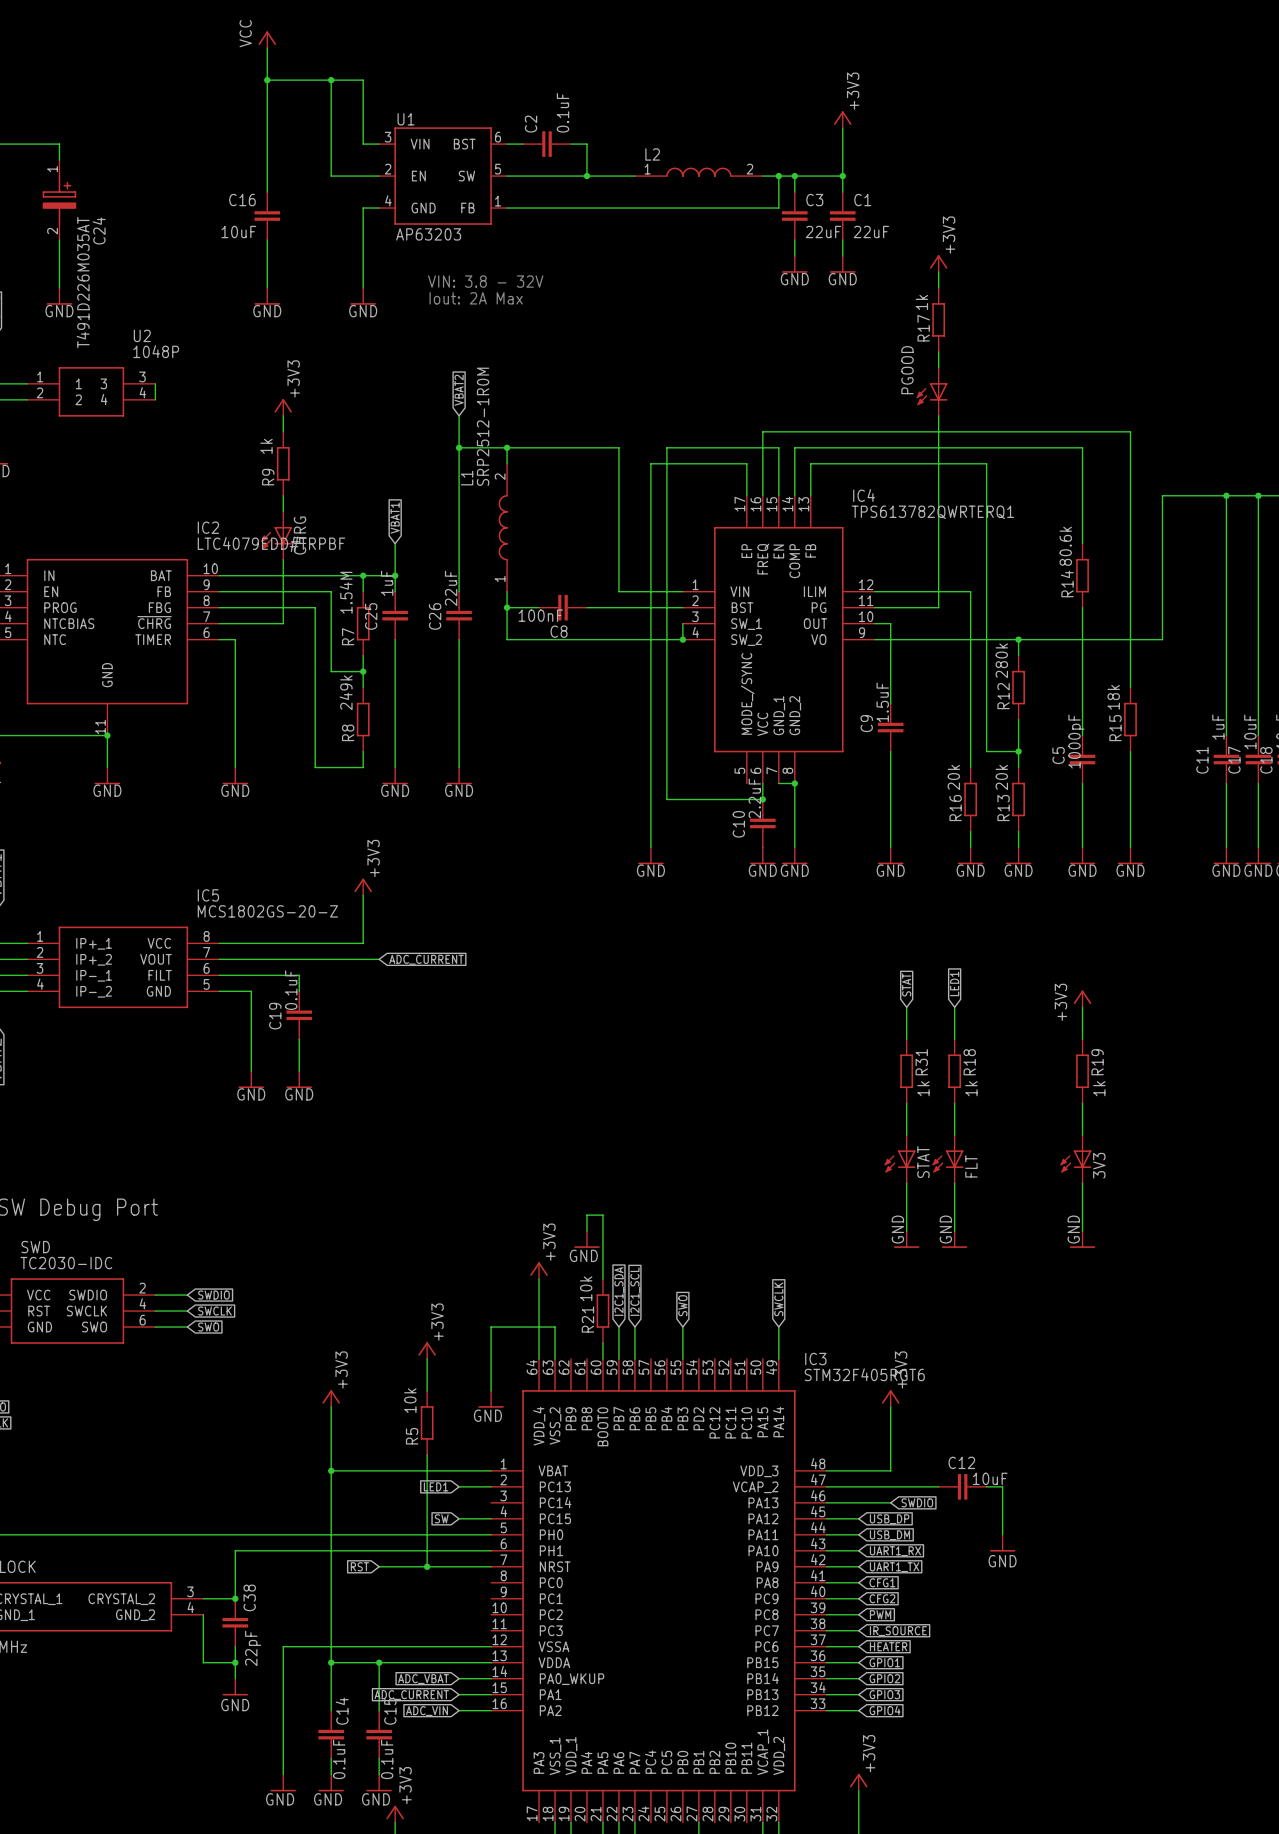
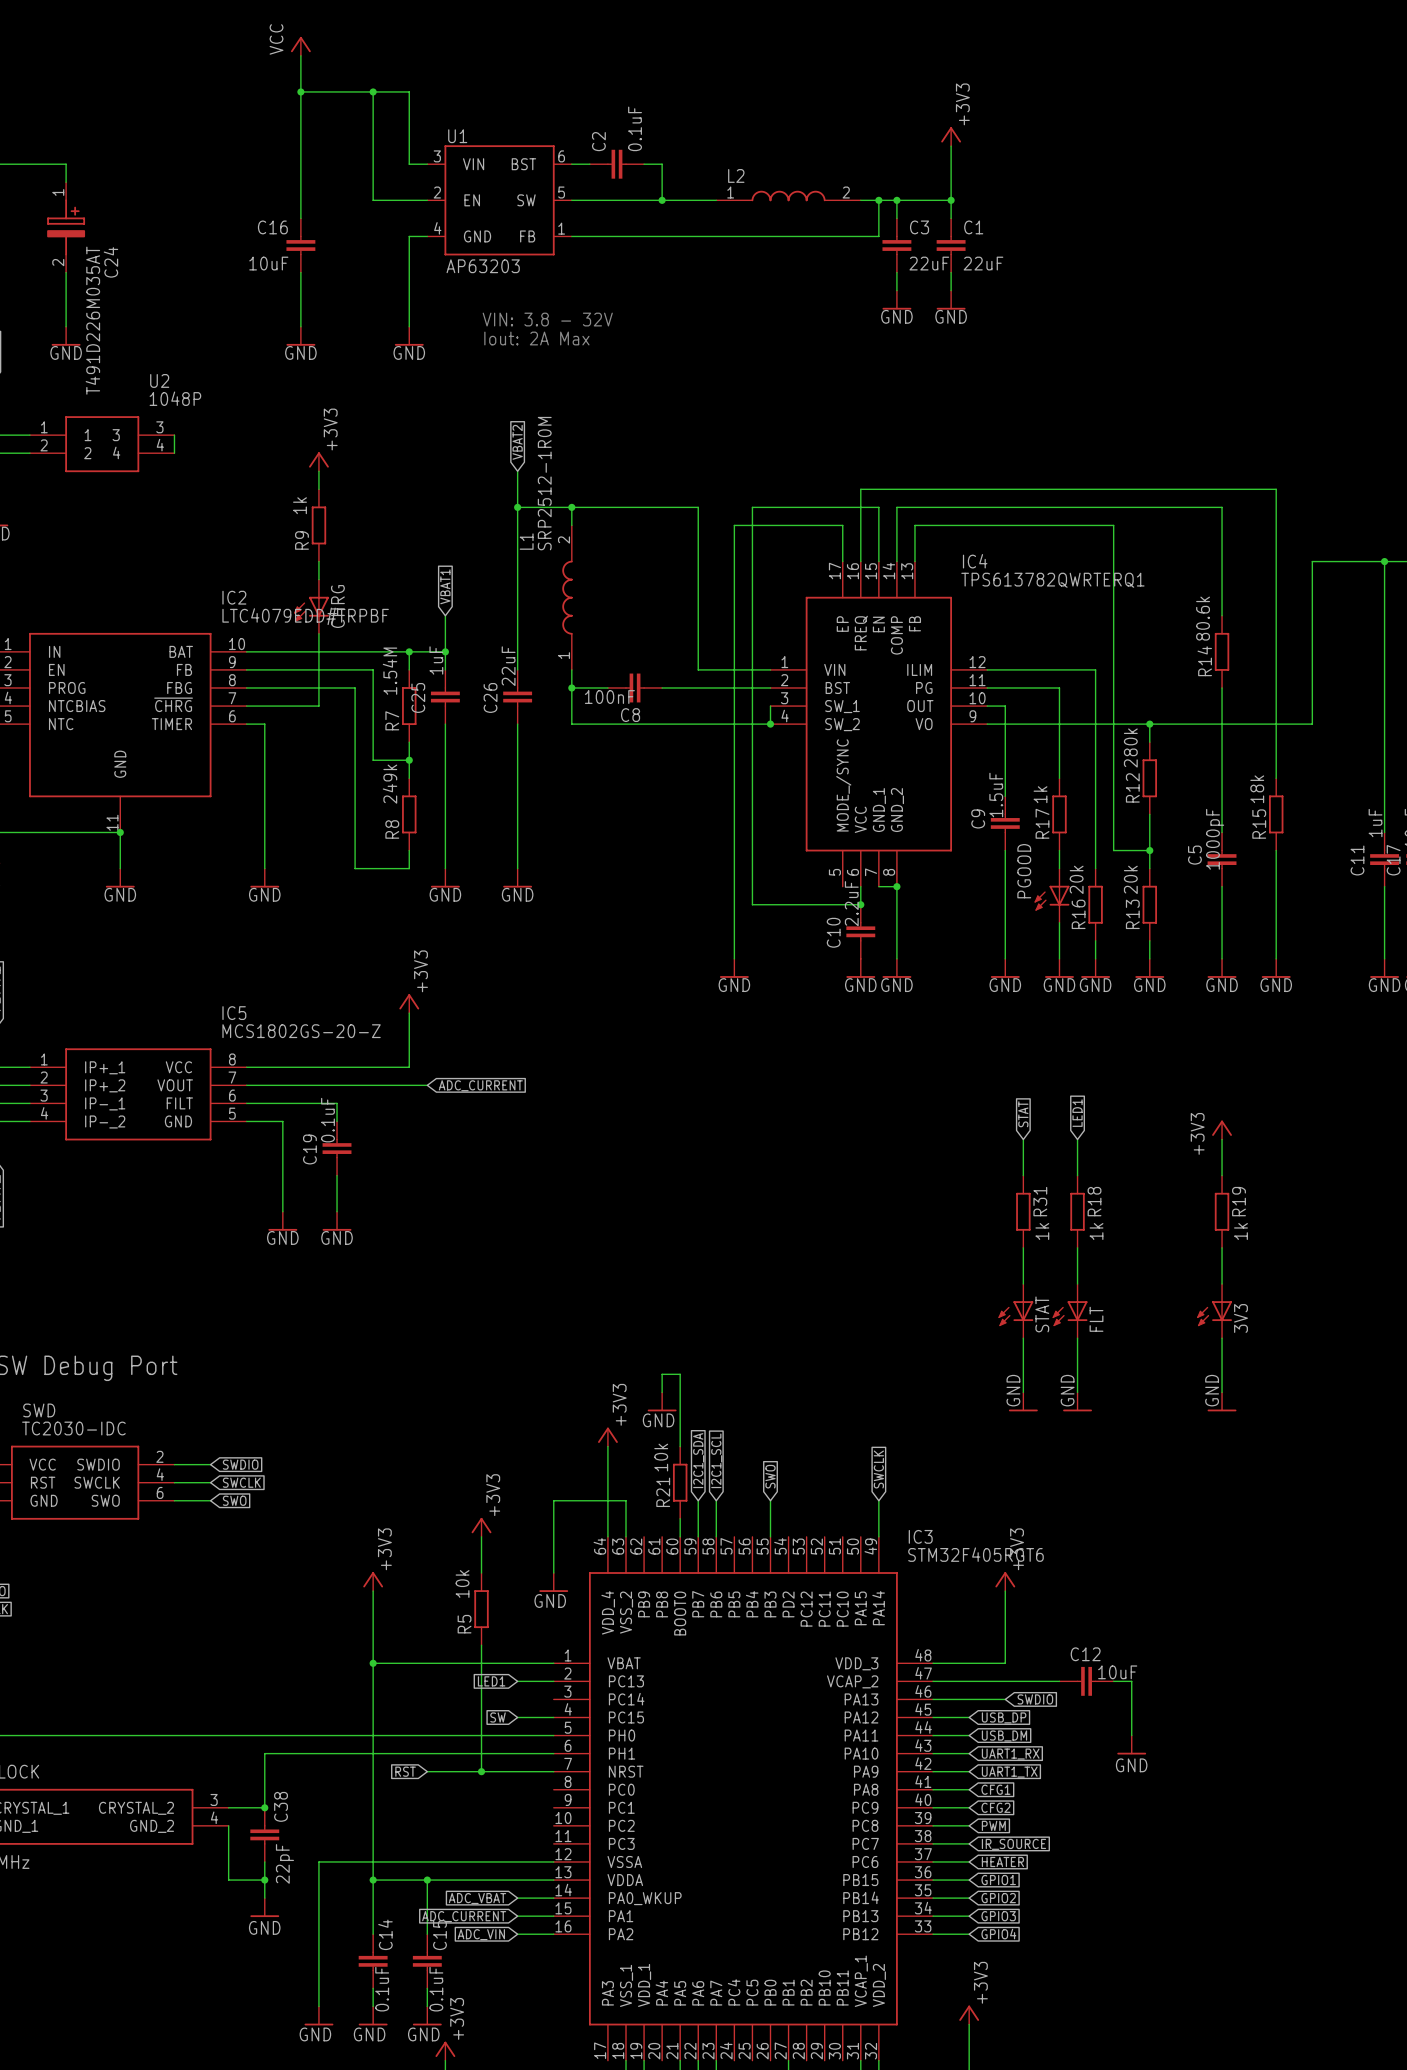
power symbol: +3V3 (938, 263) -> none
wire: (938, 271) (938, 287) -> none
R17 position: (938, 319) -> (1059, 814)
wire: (938, 351) (938, 367) -> none
PGOOD: (932, 391) -> none
wire: (938, 415) (938, 607) -> (1059, 778) (1059, 687)
wire: none -> (1059, 850) (1059, 868)
PGOOD: none -> (1051, 895)
wire: none -> (1059, 922) (1059, 958)
power symbol: none -> GND (1059, 968)

